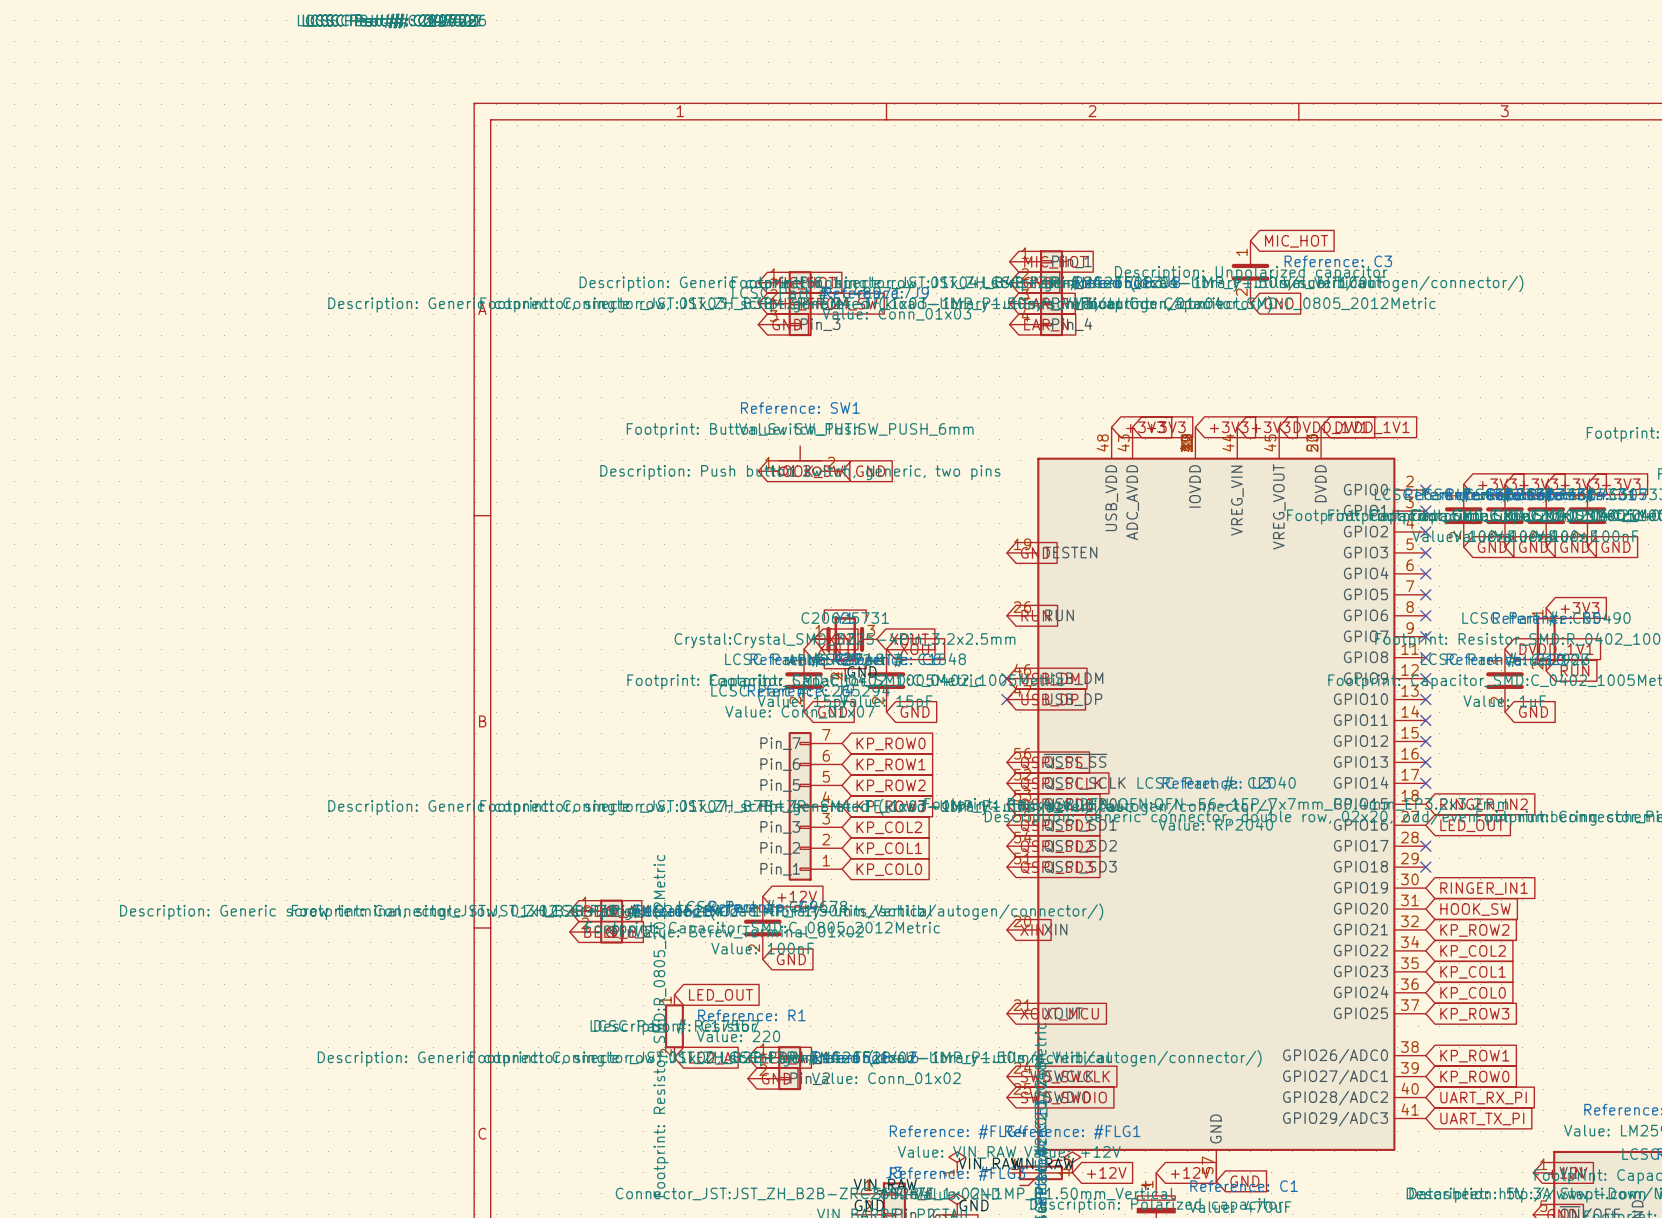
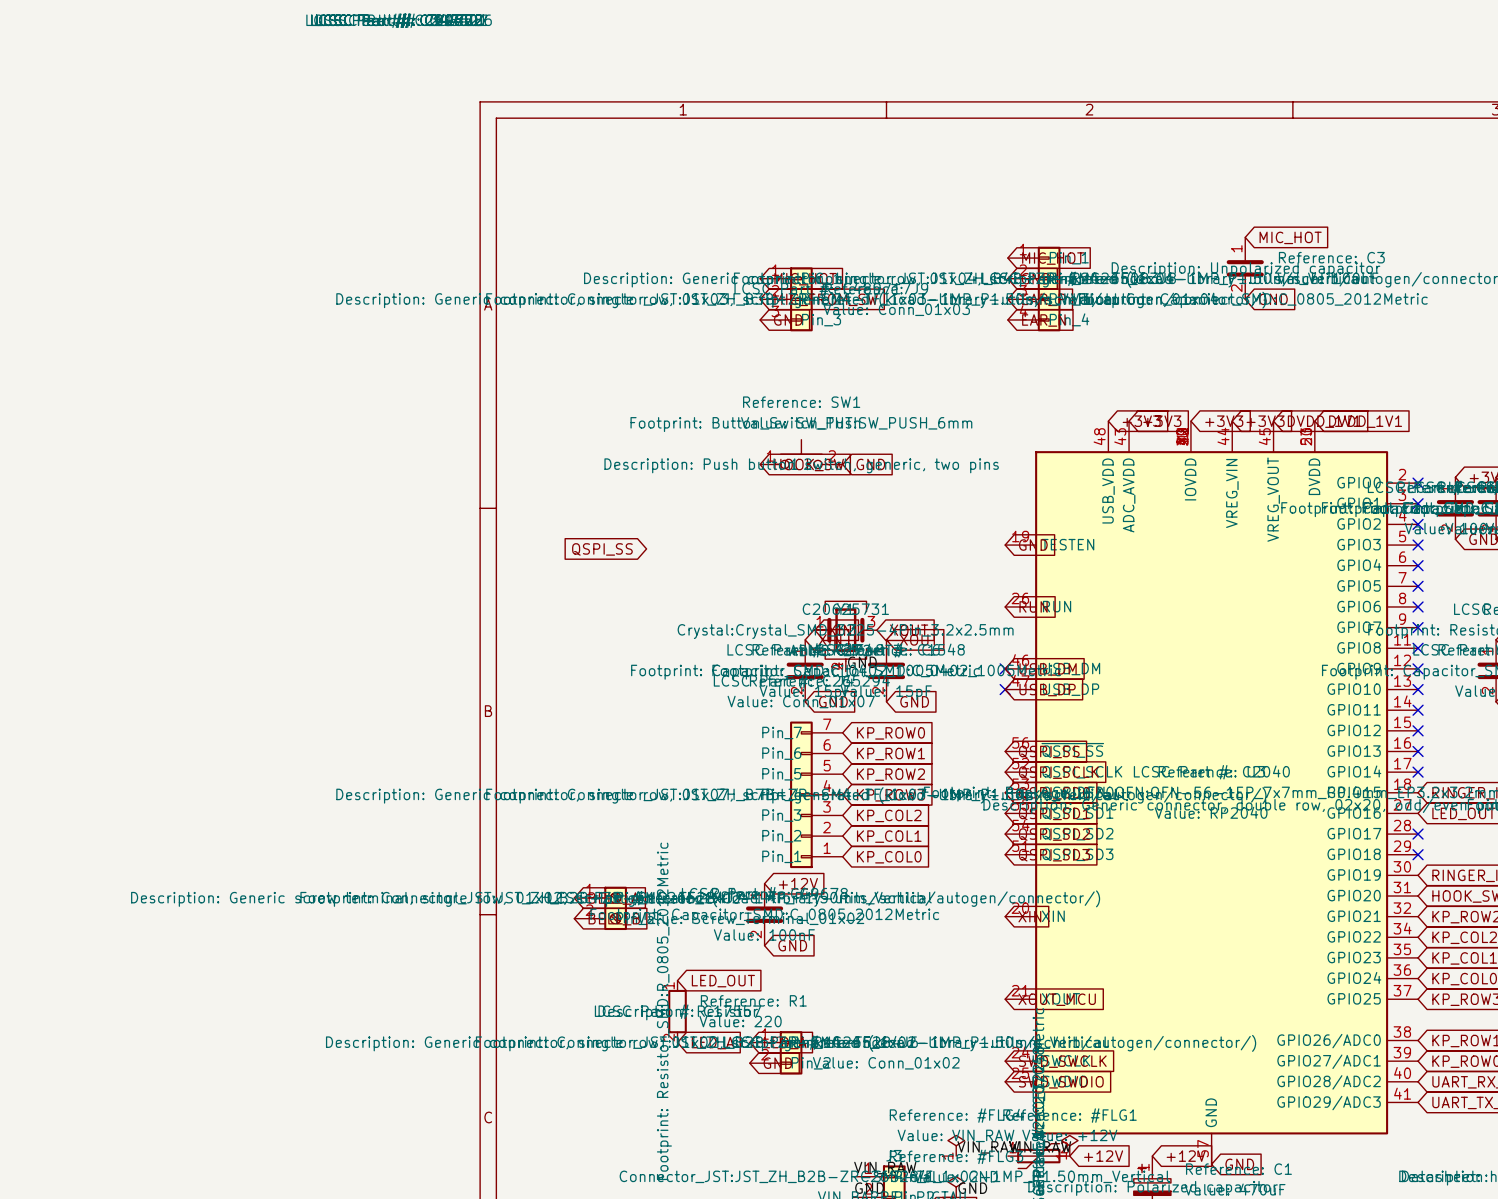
global label: none -> QSPI_SS (602, 549)

